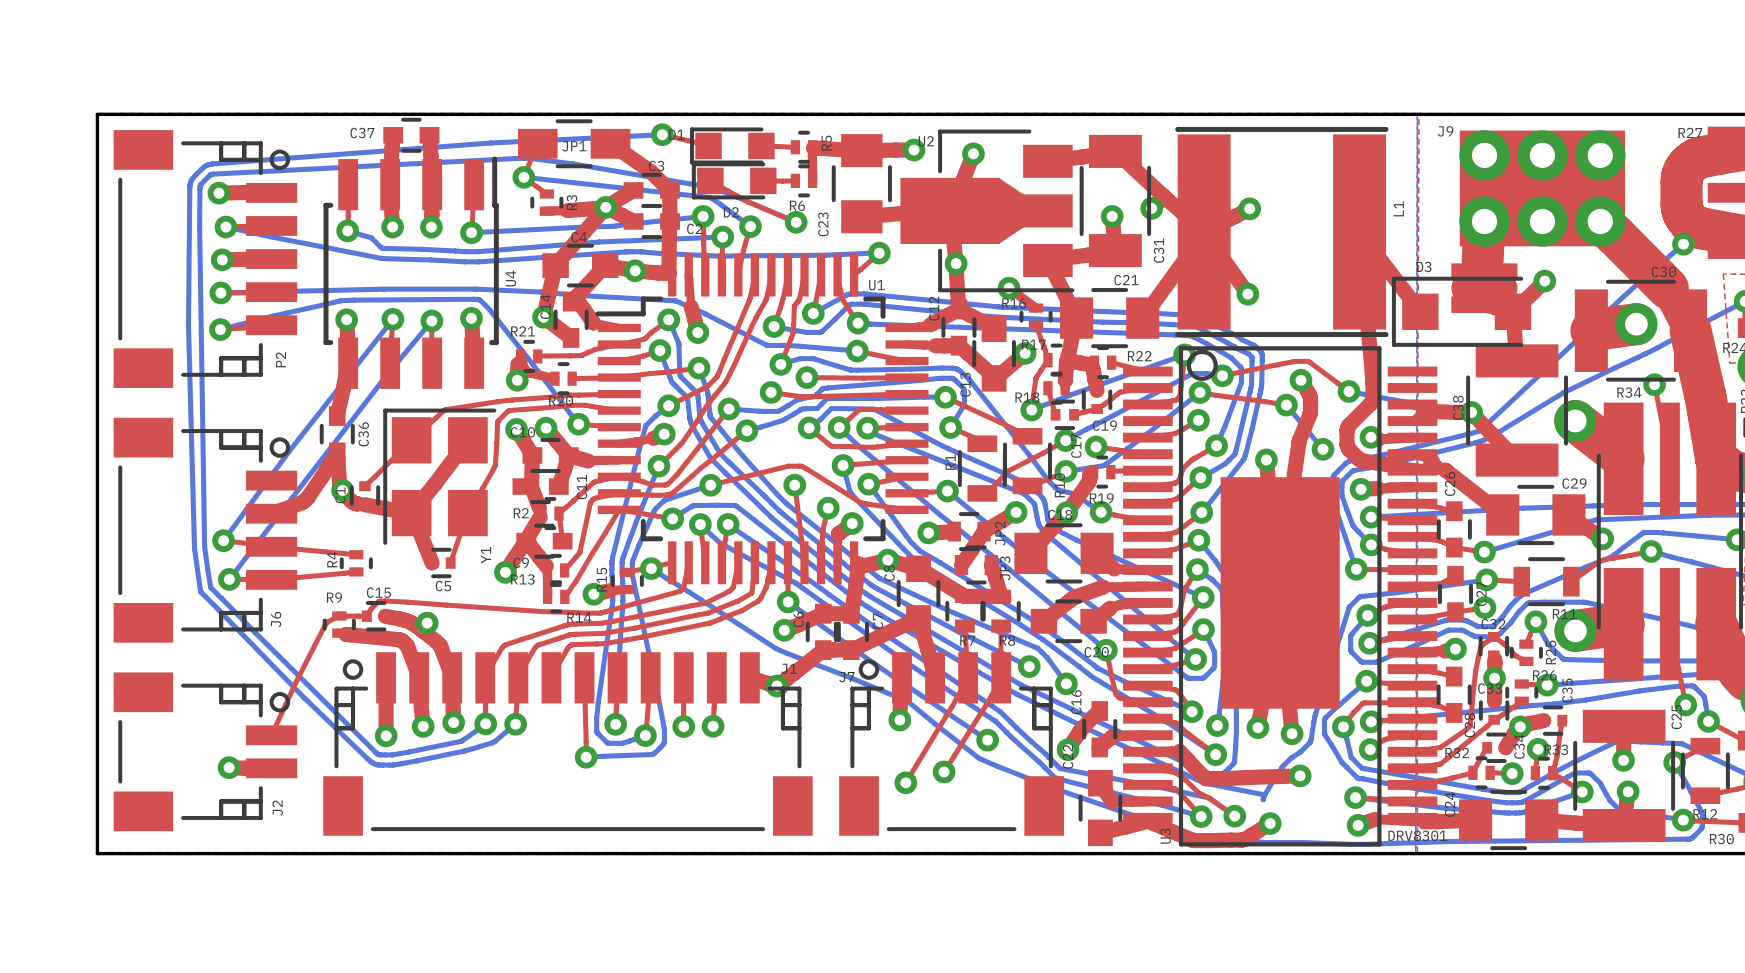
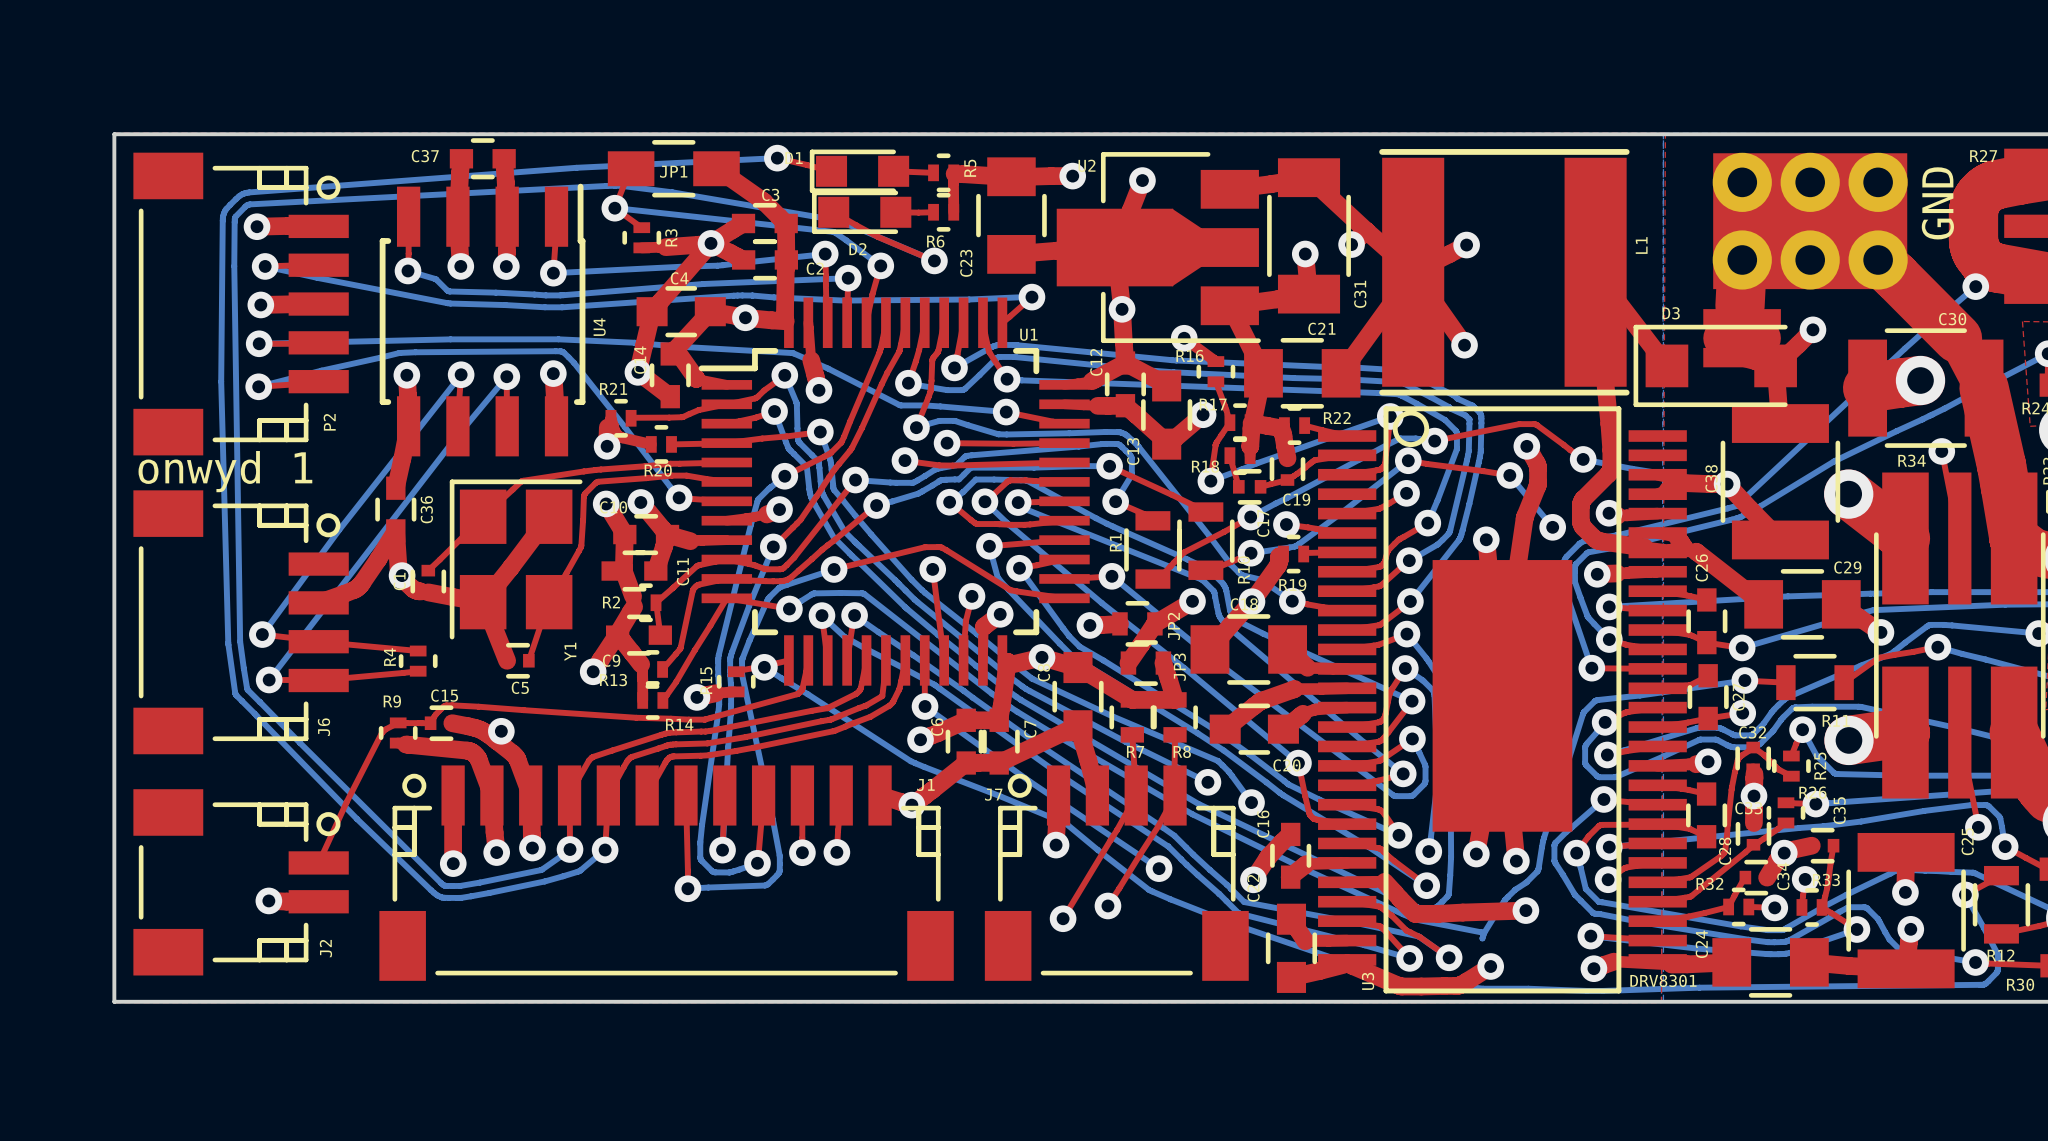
J9 name: J9 (1445, 131) -> none
text: none -> GND (1937, 203)
text: none -> onwyd 1 (225, 471)

